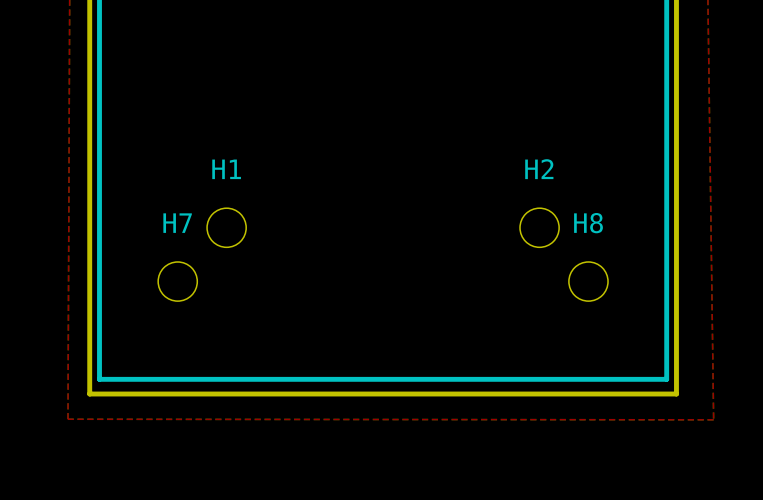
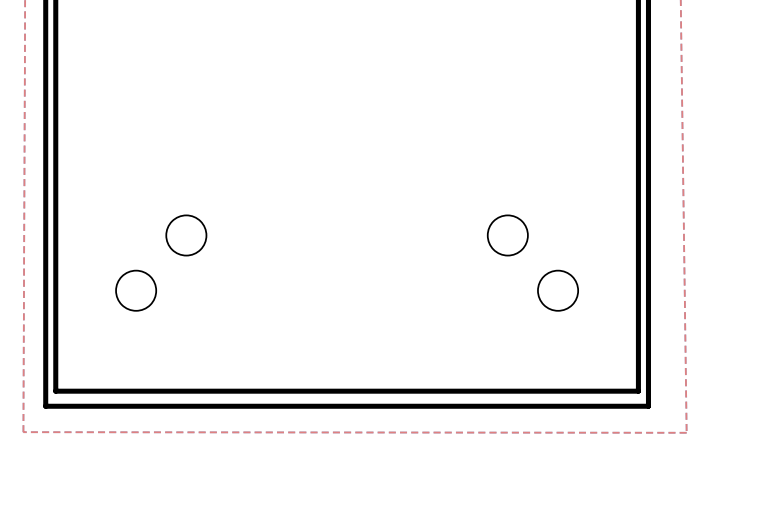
H1 name: H1 (226, 169) -> none
H2 name: H2 (539, 169) -> none
H7 name: H7 (177, 223) -> none
H8 name: H8 (588, 223) -> none

